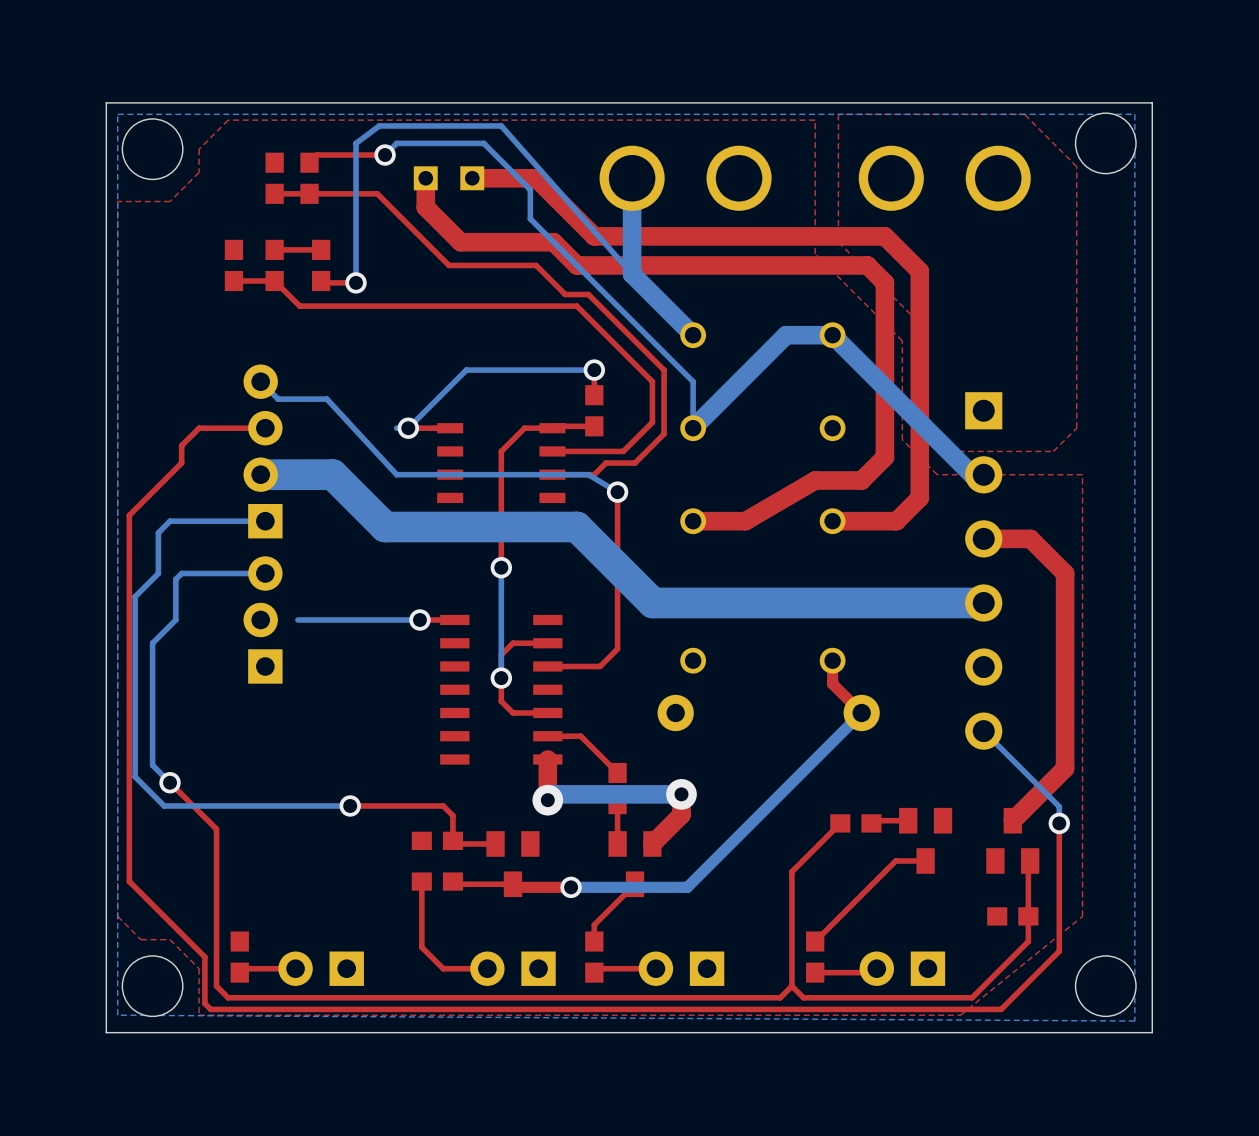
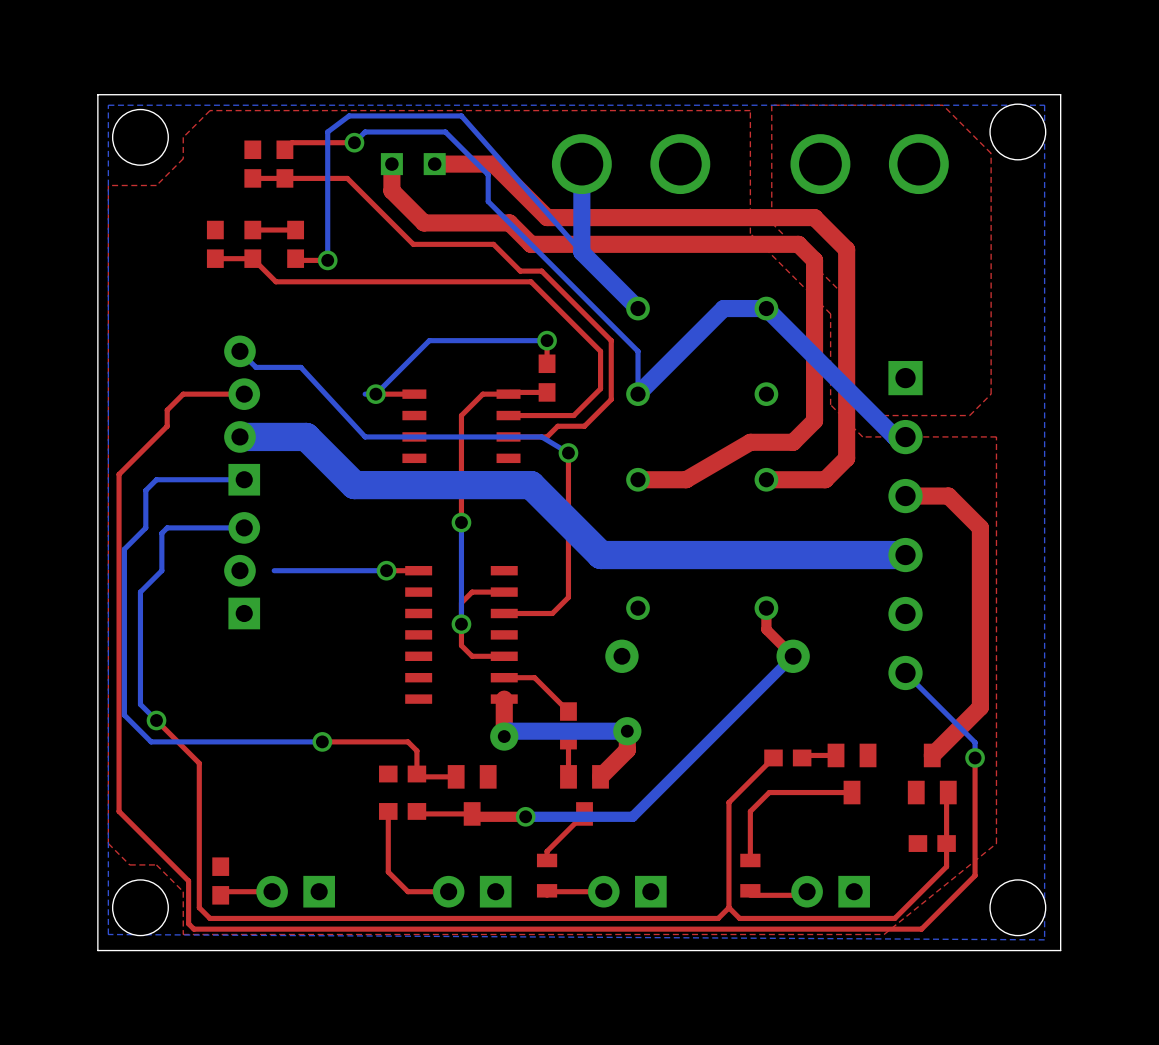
top track: (895, 860) (815, 941) -> (824, 792) (769, 792) (750, 811) (750, 860)
part footprint: [585, 931, 604, 983] -> [536, 853, 558, 898]
part footprint: [806, 931, 825, 983] -> [740, 853, 761, 898]

